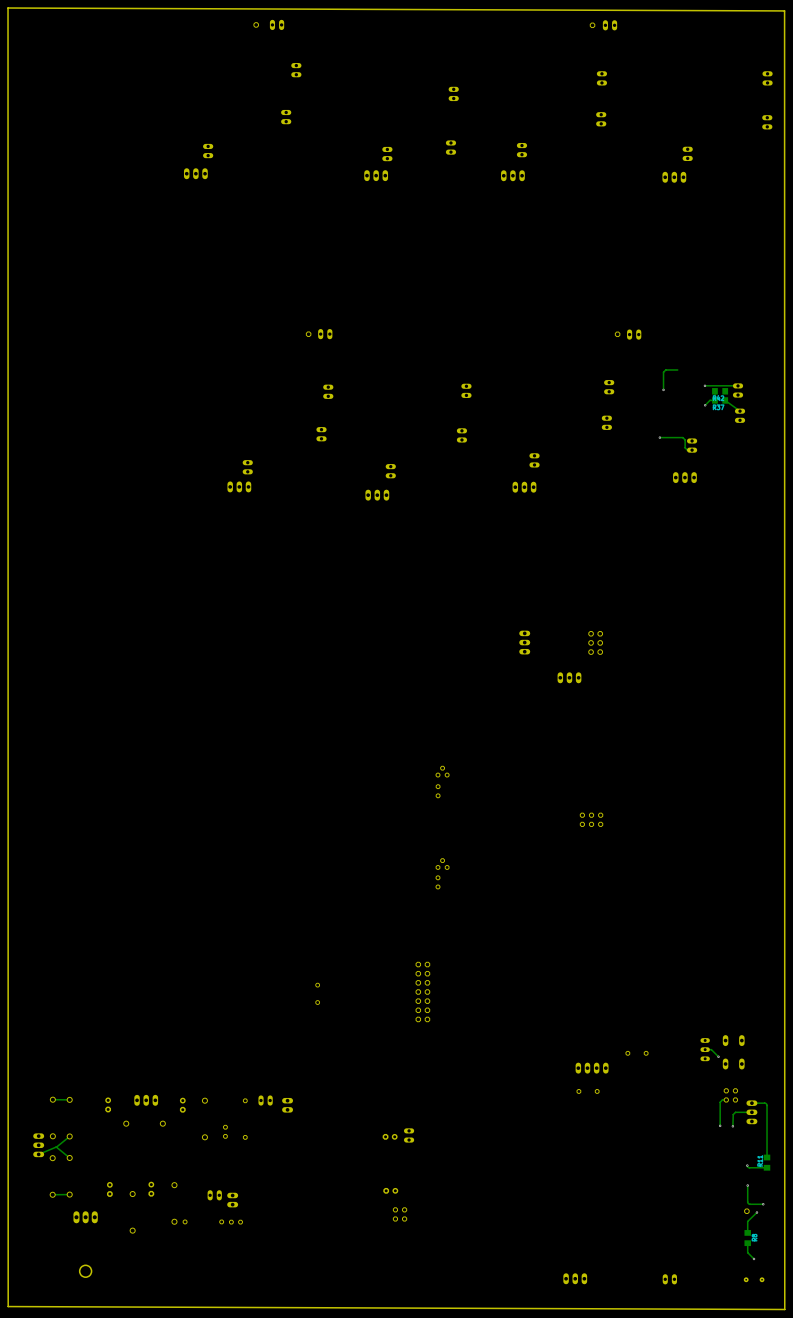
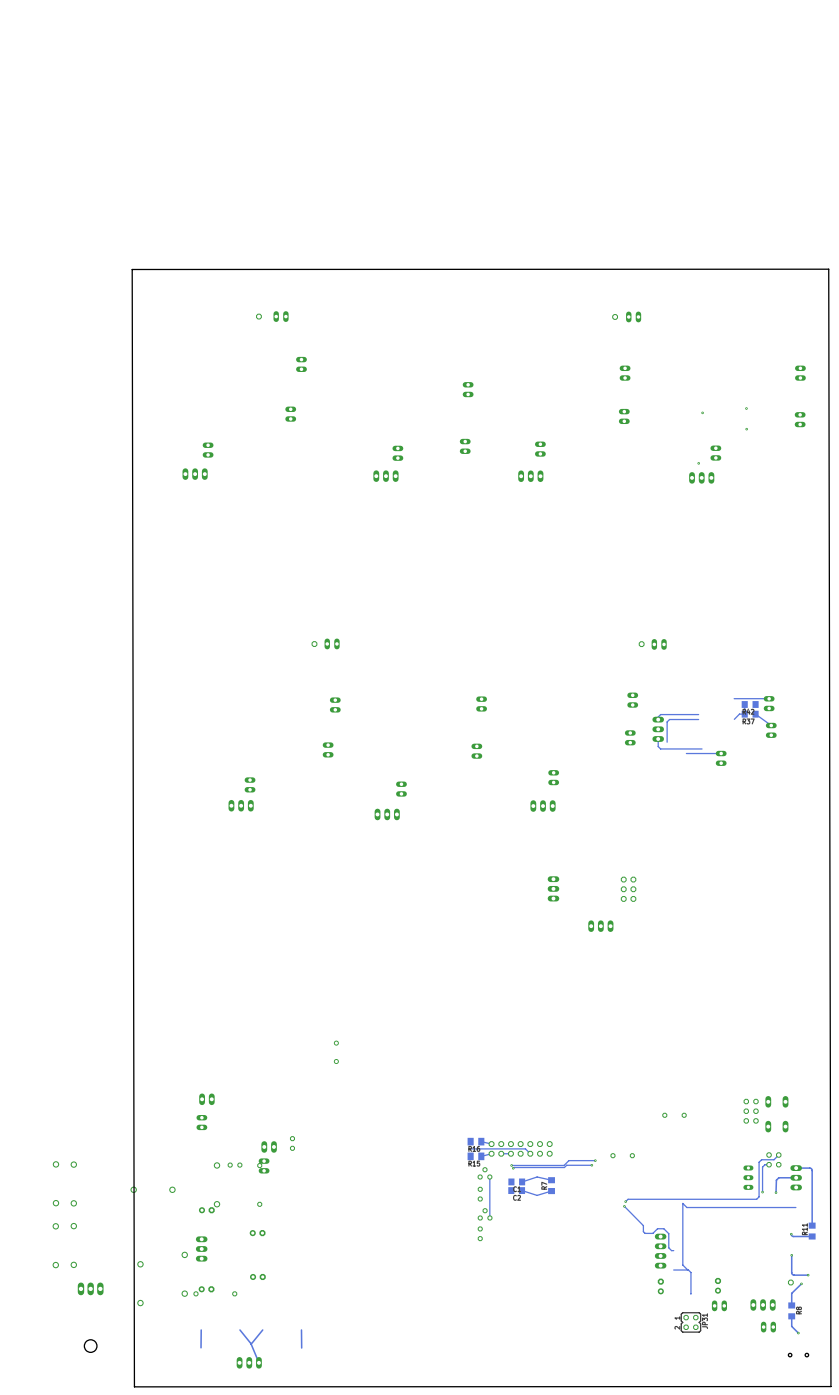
board edge: (8, 8) (8, 1306) (784, 1309) (784, 10) (8, 8) -> (828, 269) (830, 1386) (134, 1386) (132, 269) (828, 269)
part: (256, 24) -> none
part: (277, 24) -> none
part: (592, 25) -> none
part: (610, 25) -> none
part: (296, 70) -> none
part: (601, 78) -> none
part: (767, 78) -> none
part: (453, 93) -> none
part: (286, 117) -> none
part: (601, 119) -> none
part: (767, 122) -> none
part: (450, 147) -> none
part: (521, 150) -> none
part: (208, 151) -> none
part: (687, 153) -> none
part: (387, 154) -> none
part: (195, 173) -> none
part: (376, 175) -> none
part: (512, 175) -> none
part: (674, 177) -> none
part: none -> (281, 316)
part: none -> (633, 316)
part position: (308, 334) -> (258, 316)
part: (325, 334) -> none
part position: (617, 334) -> (615, 316)
part: (634, 334) -> none
part: none -> (301, 364)
part: none -> (625, 373)
part: none -> (800, 373)
part: none -> (468, 389)
track: (677, 369) (665, 369) (663, 372) (663, 389) -> none
track: (704, 385) (738, 385) -> none
part: (609, 387) -> none
part: (466, 390) -> none
part: (738, 390) -> none
part: none -> (290, 414)
part: (328, 391) -> none
track: (714, 391) (715, 400) (710, 400) (705, 405) -> none
part position: (720, 391) -> (750, 704)
part: none -> (624, 416)
part: none -> (800, 419)
part position: (720, 400) -> (750, 714)
track: (725, 400) (740, 411) -> none
part: (740, 415) -> none
part: none -> (465, 446)
part: (606, 422) -> none
part: none -> (540, 449)
part: none -> (208, 450)
part: none -> (397, 453)
part: (321, 434) -> none
part: (461, 435) -> none
track: (659, 437) (682, 437) (685, 439) (685, 447) (692, 450) -> none
part position: (692, 445) -> (715, 453)
part: none -> (195, 474)
part: (534, 460) -> none
part: (247, 467) -> none
part: (390, 471) -> none
part position: (684, 477) -> (701, 477)
part: (239, 486) -> none
part position: (524, 487) -> (530, 476)
part position: (377, 495) -> (385, 476)
part: none -> (314, 644)
part: none -> (332, 643)
part: none -> (641, 644)
part: none -> (659, 644)
part: (524, 642) -> none
part: (595, 642) -> none
track: none -> (734, 698) (769, 698)
part: none -> (632, 700)
part: none -> (481, 704)
part: none -> (769, 703)
part: none -> (335, 704)
track: none -> (744, 704) (744, 713) (739, 714) (734, 719)
track: none -> (698, 714) (660, 714) (658, 719)
track: none -> (755, 714) (771, 725)
part: (569, 677) -> none
track: none -> (698, 719) (669, 719) (667, 721) (667, 742)
part: none -> (658, 729)
part: none -> (771, 730)
part: none -> (630, 737)
track: none -> (658, 738) (658, 746) (660, 748) (702, 748)
part: none -> (328, 749)
part: none -> (476, 751)
track: none -> (721, 753) (686, 753)
part: none -> (721, 758)
part: none -> (553, 777)
part: none -> (250, 784)
part: none -> (401, 789)
part: none -> (241, 805)
part: none -> (543, 806)
part: none -> (387, 814)
part: (442, 771) -> none
part: (438, 791) -> none
part: (591, 819) -> none
part: none -> (553, 888)
part: none -> (628, 889)
part: (442, 864) -> none
part: none -> (600, 926)
part: (437, 882) -> none
part: (422, 992) -> none
part: none -> (206, 1099)
track: (705, 1049) (711, 1049) (718, 1056) -> none
part position: (705, 1049) -> (748, 1177)
part: none -> (751, 1111)
via: (718, 1056) -> none
part: none -> (201, 1122)
part: (592, 1068) -> none
part: none -> (475, 1141)
track: none -> (481, 1141) (491, 1144)
part: none -> (292, 1143)
track: none -> (470, 1148) (525, 1148) (530, 1153)
part: none -> (520, 1148)
track: none -> (491, 1153) (481, 1156)
track: none -> (510, 1153) (501, 1153)
track: none -> (778, 1155) (773, 1159) (761, 1159) (759, 1162) (759, 1196) (756, 1199) (628, 1199) (625, 1201)
part: none -> (475, 1156)
track: none -> (595, 1160) (568, 1160) (564, 1165) (511, 1165)
via: none -> (595, 1160)
track: (52, 1099) (69, 1099) -> none
part: (146, 1100) -> none
part rotation: 0° (265, 1100) -> 90° clockwise (264, 1165)
part position: (265, 1100) -> (264, 1165)
via: none -> (511, 1165)
track: none -> (591, 1165) (513, 1168)
via: none -> (591, 1165)
via: none -> (513, 1168)
part: (108, 1104) -> none
part: (182, 1105) -> none
part rotation: 0° (287, 1105) -> 90° clockwise (269, 1146)
part position: (287, 1105) -> (269, 1146)
part: none -> (484, 1173)
track: none -> (489, 1177) (489, 1217)
track: none -> (551, 1180) (537, 1177) (522, 1181)
part: none -> (516, 1181)
part: none -> (551, 1185)
part: none -> (516, 1190)
track: none -> (522, 1190) (537, 1195) (551, 1191)
part: none -> (480, 1194)
part rotation: 0° (225, 1131) -> 90° clockwise (235, 1165)
part position: (225, 1131) -> (235, 1165)
via: none -> (625, 1201)
part: (409, 1135) -> none
track: (69, 1136) (56, 1146) (38, 1154) -> none
part: (390, 1136) -> none
track: none -> (624, 1206) (643, 1225) (645, 1233) (652, 1233) (657, 1228) (663, 1228) (668, 1233) (668, 1247) (673, 1250)
via: none -> (624, 1206)
track: none -> (795, 1207) (686, 1207) (682, 1203) (682, 1265) (687, 1270)
part: none -> (206, 1210)
part: (38, 1145) -> none
part: none -> (485, 1214)
track: (56, 1147) (69, 1157) -> none
part: none -> (257, 1233)
part: none -> (480, 1233)
part: none -> (201, 1248)
part: none -> (660, 1251)
part: (109, 1189) -> none
part: (151, 1189) -> none
part: (390, 1190) -> none
track: (69, 1194) (52, 1194) -> none
part: (214, 1195) -> none
track: none -> (673, 1270) (688, 1270) (690, 1272) (690, 1293)
part: (232, 1200) -> none
part: none -> (257, 1276)
part: (400, 1214) -> none
part: none -> (660, 1286)
part: none -> (717, 1285)
part: none -> (206, 1289)
part: (235, 1222) -> none
part: none -> (763, 1304)
part: none -> (719, 1305)
part: none -> (690, 1322)
part: none -> (768, 1327)
track: none -> (201, 1329) (201, 1347)
track: none -> (239, 1329) (250, 1343) (258, 1362)
track: none -> (262, 1329) (251, 1344)
track: none -> (301, 1329) (301, 1348)
part: (575, 1278) -> none
part: (669, 1279) -> none
part: none -> (249, 1362)

